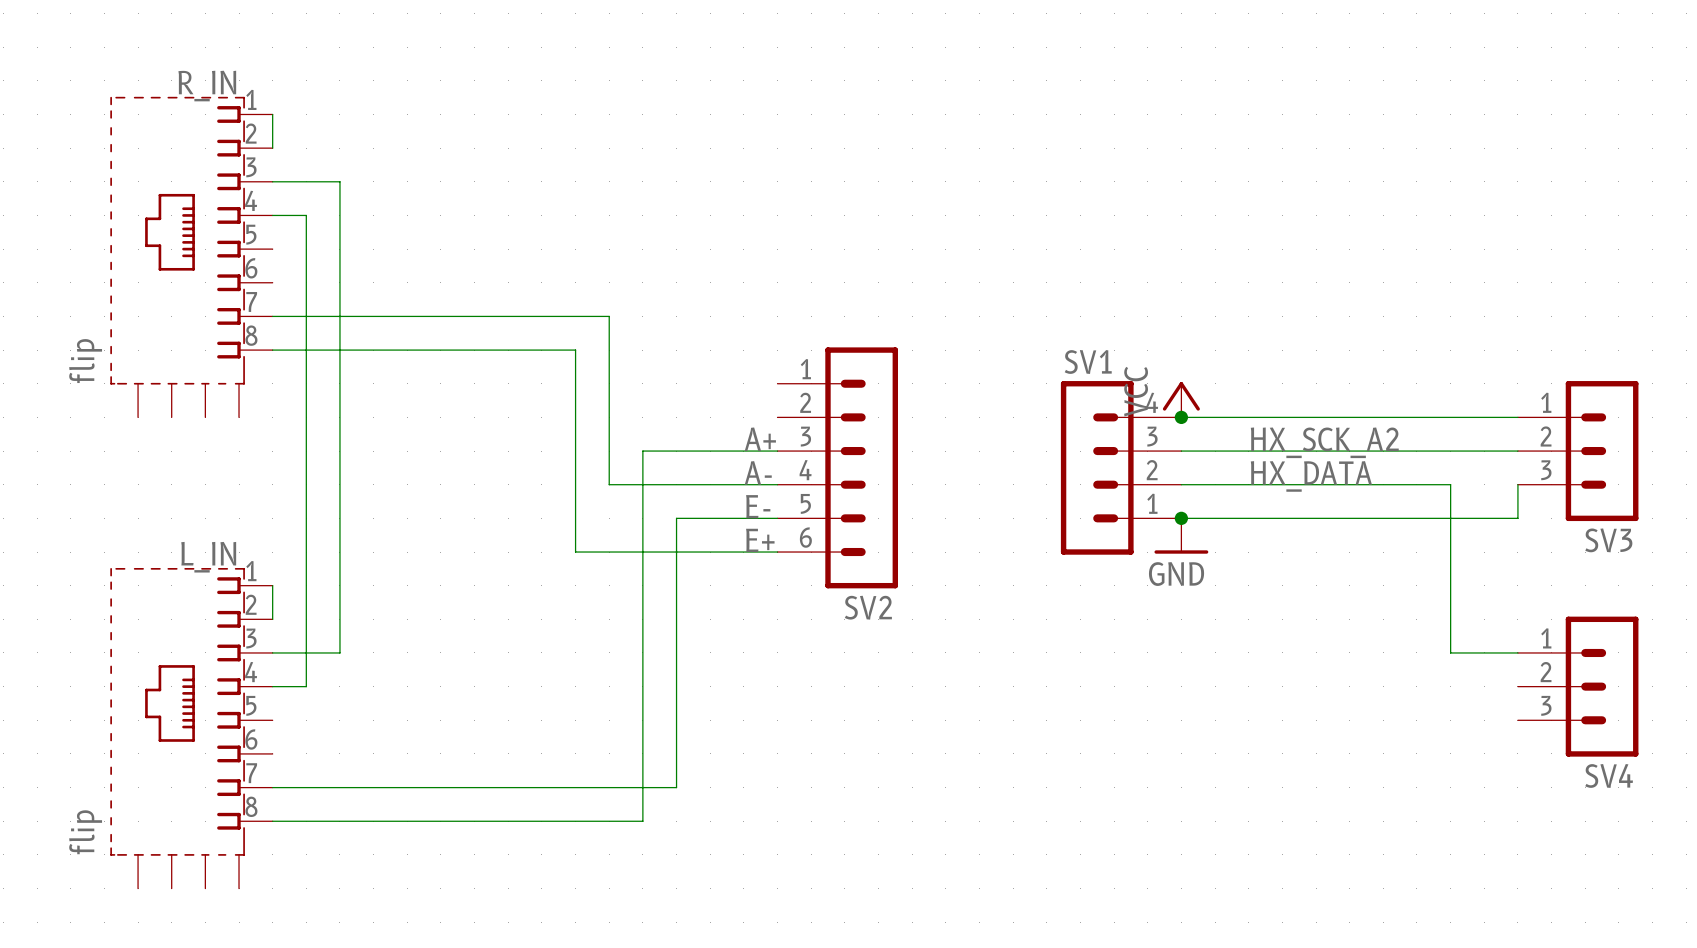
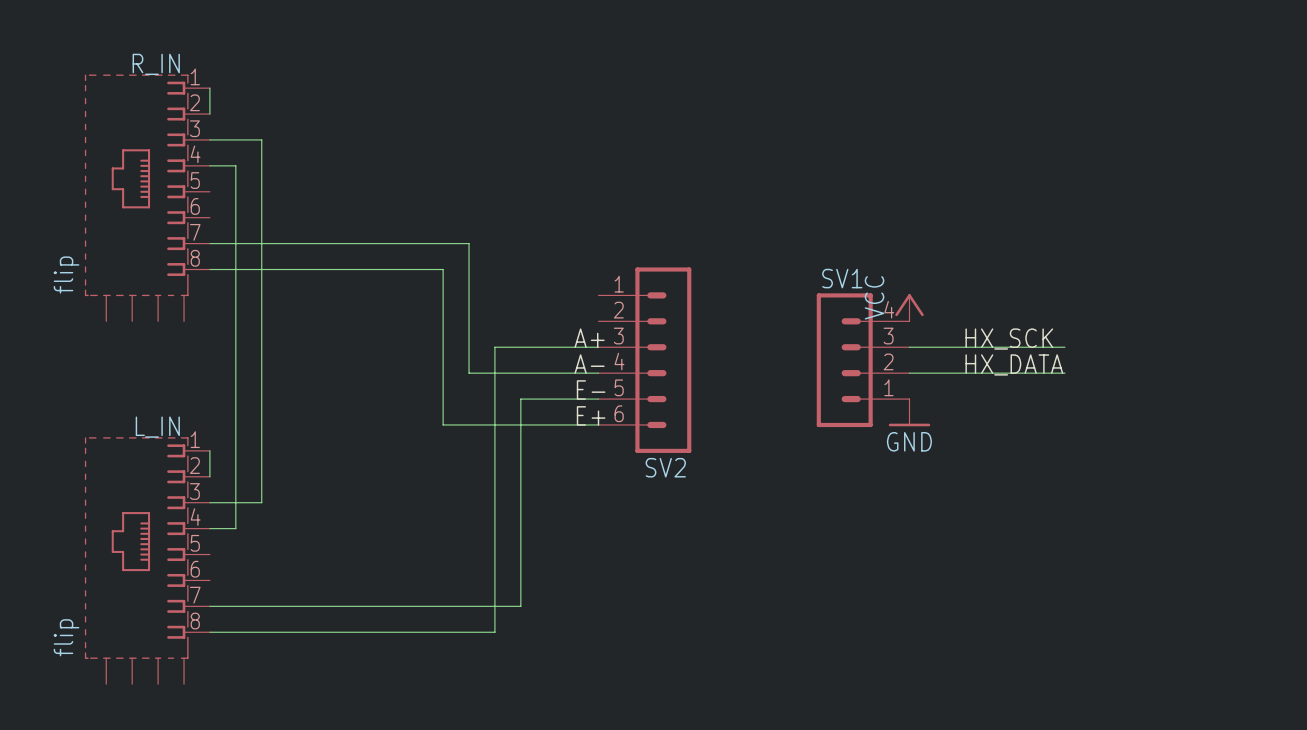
wire: (1181, 417) (1517, 417) -> none
junction: (1181, 417) -> none
label: HX_SCK_A2 (1324, 442) -> HX_SCK (1009, 339)
wire: (1383, 451) (1517, 451) -> none
SV3: (1578, 451) -> none
wire: (1383, 484) (1450, 484) (1450, 652) (1517, 652) -> none
wire: (1517, 484) (1517, 518) (1181, 518) -> none
junction: (1181, 518) -> none
SV4: (1578, 686) -> none

